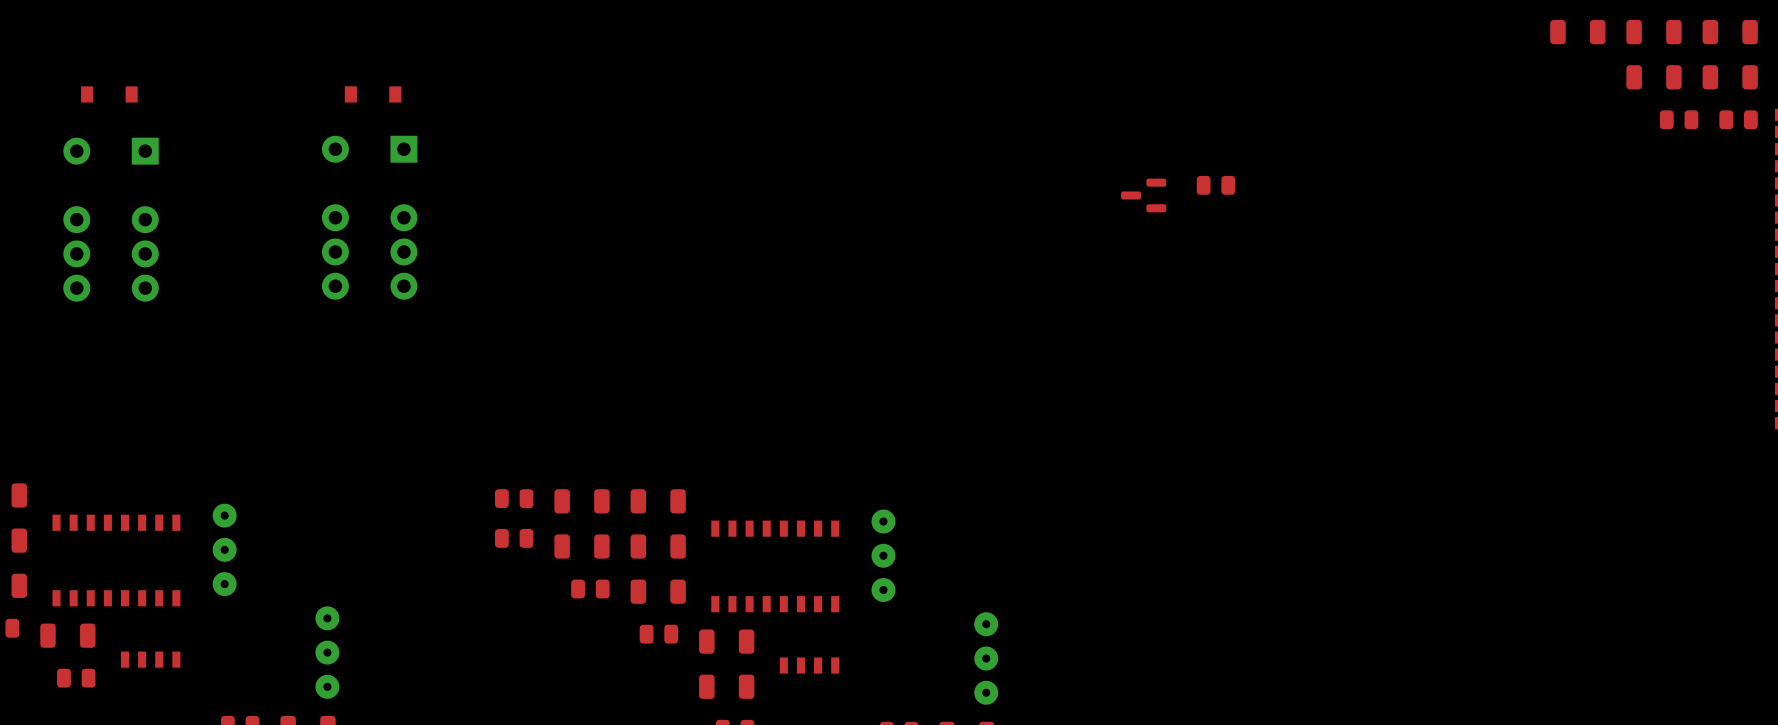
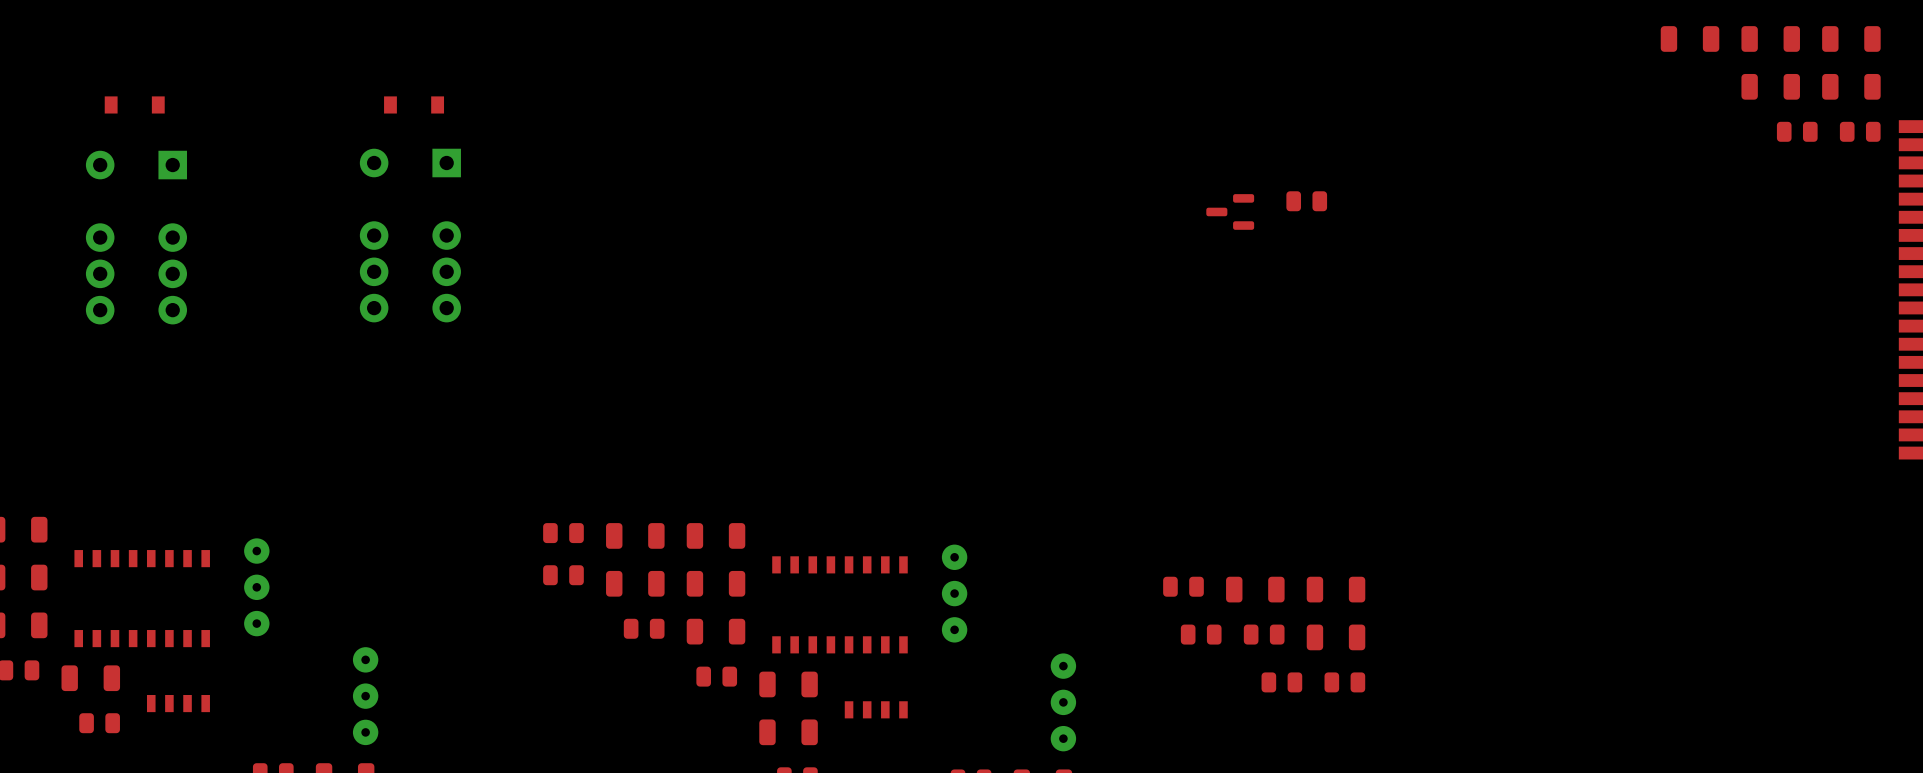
part: none -> (1183, 586)
part: none -> (1255, 589)
part: none -> (1336, 589)
part: none -> (1201, 634)
part: none -> (1264, 634)
part: none -> (1336, 637)
part: none -> (1281, 682)
part: none -> (1344, 682)

